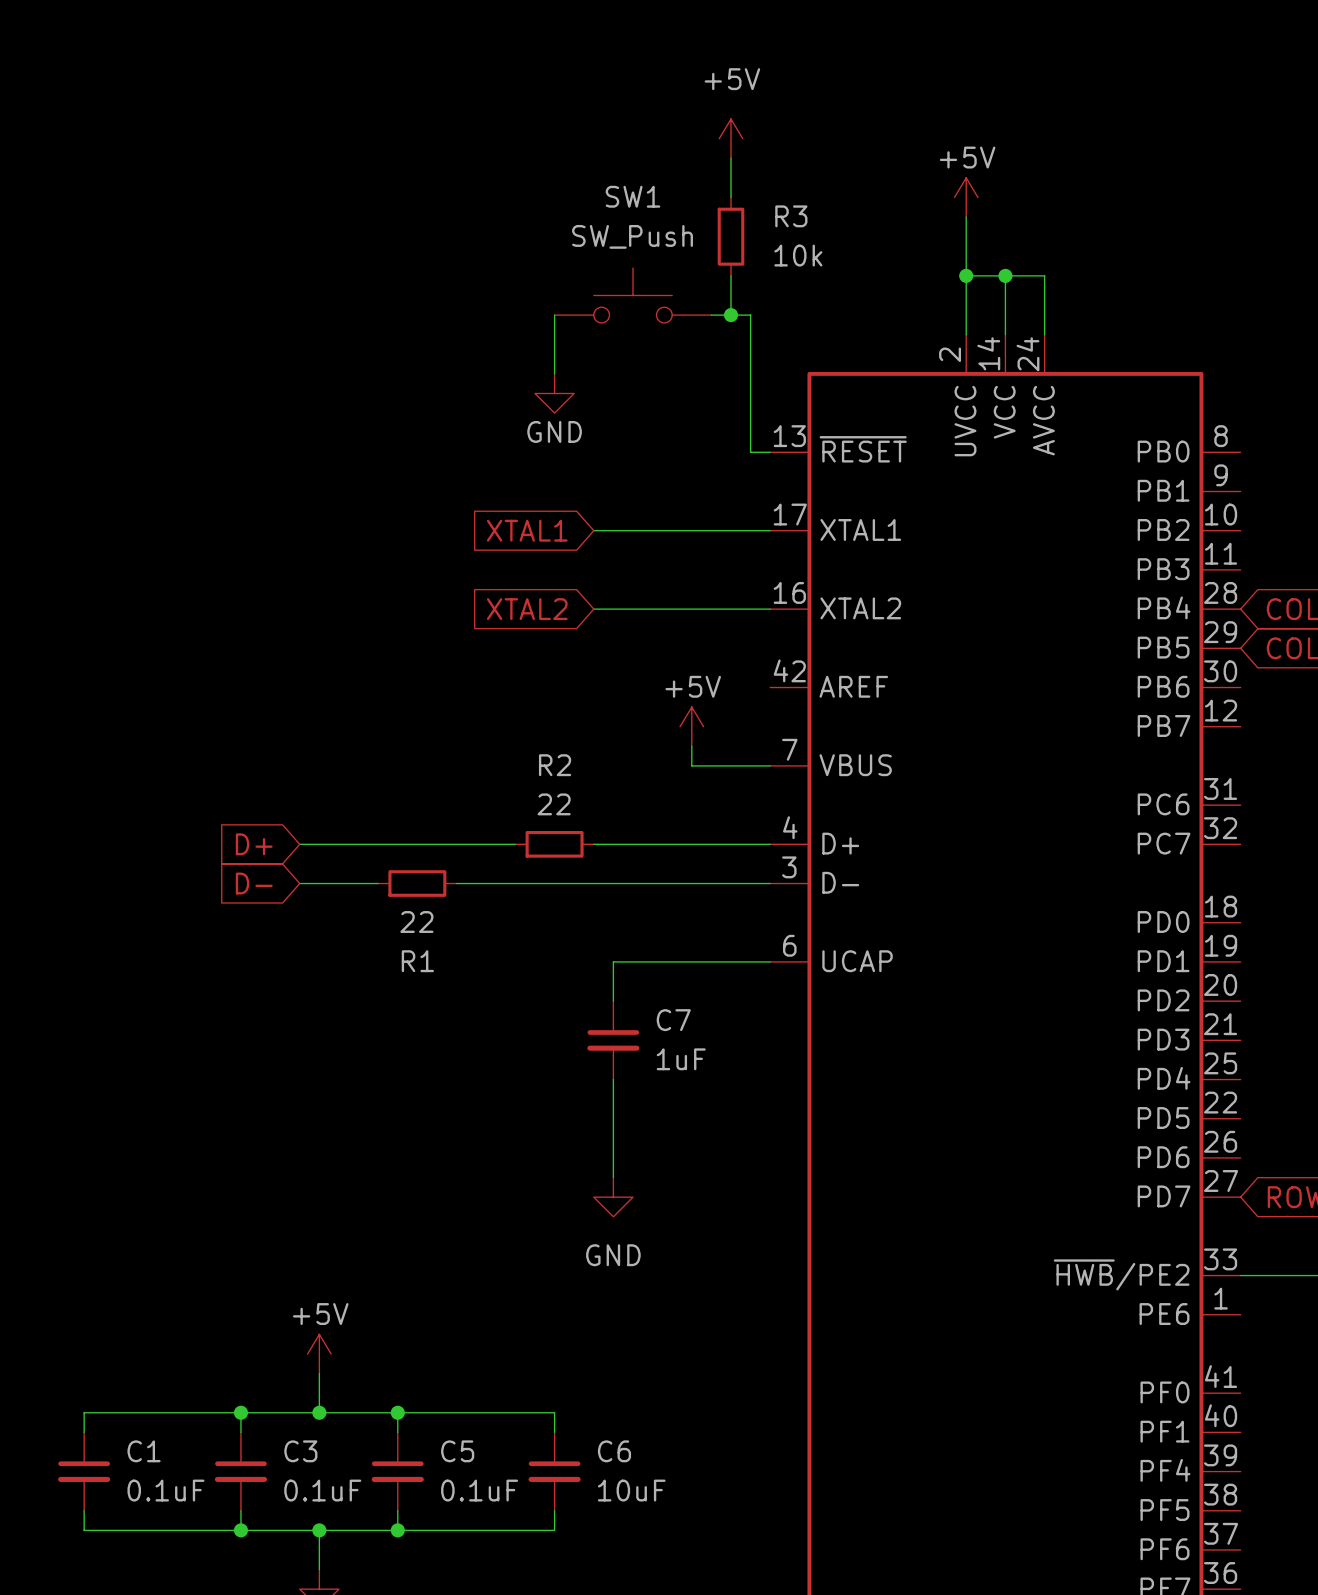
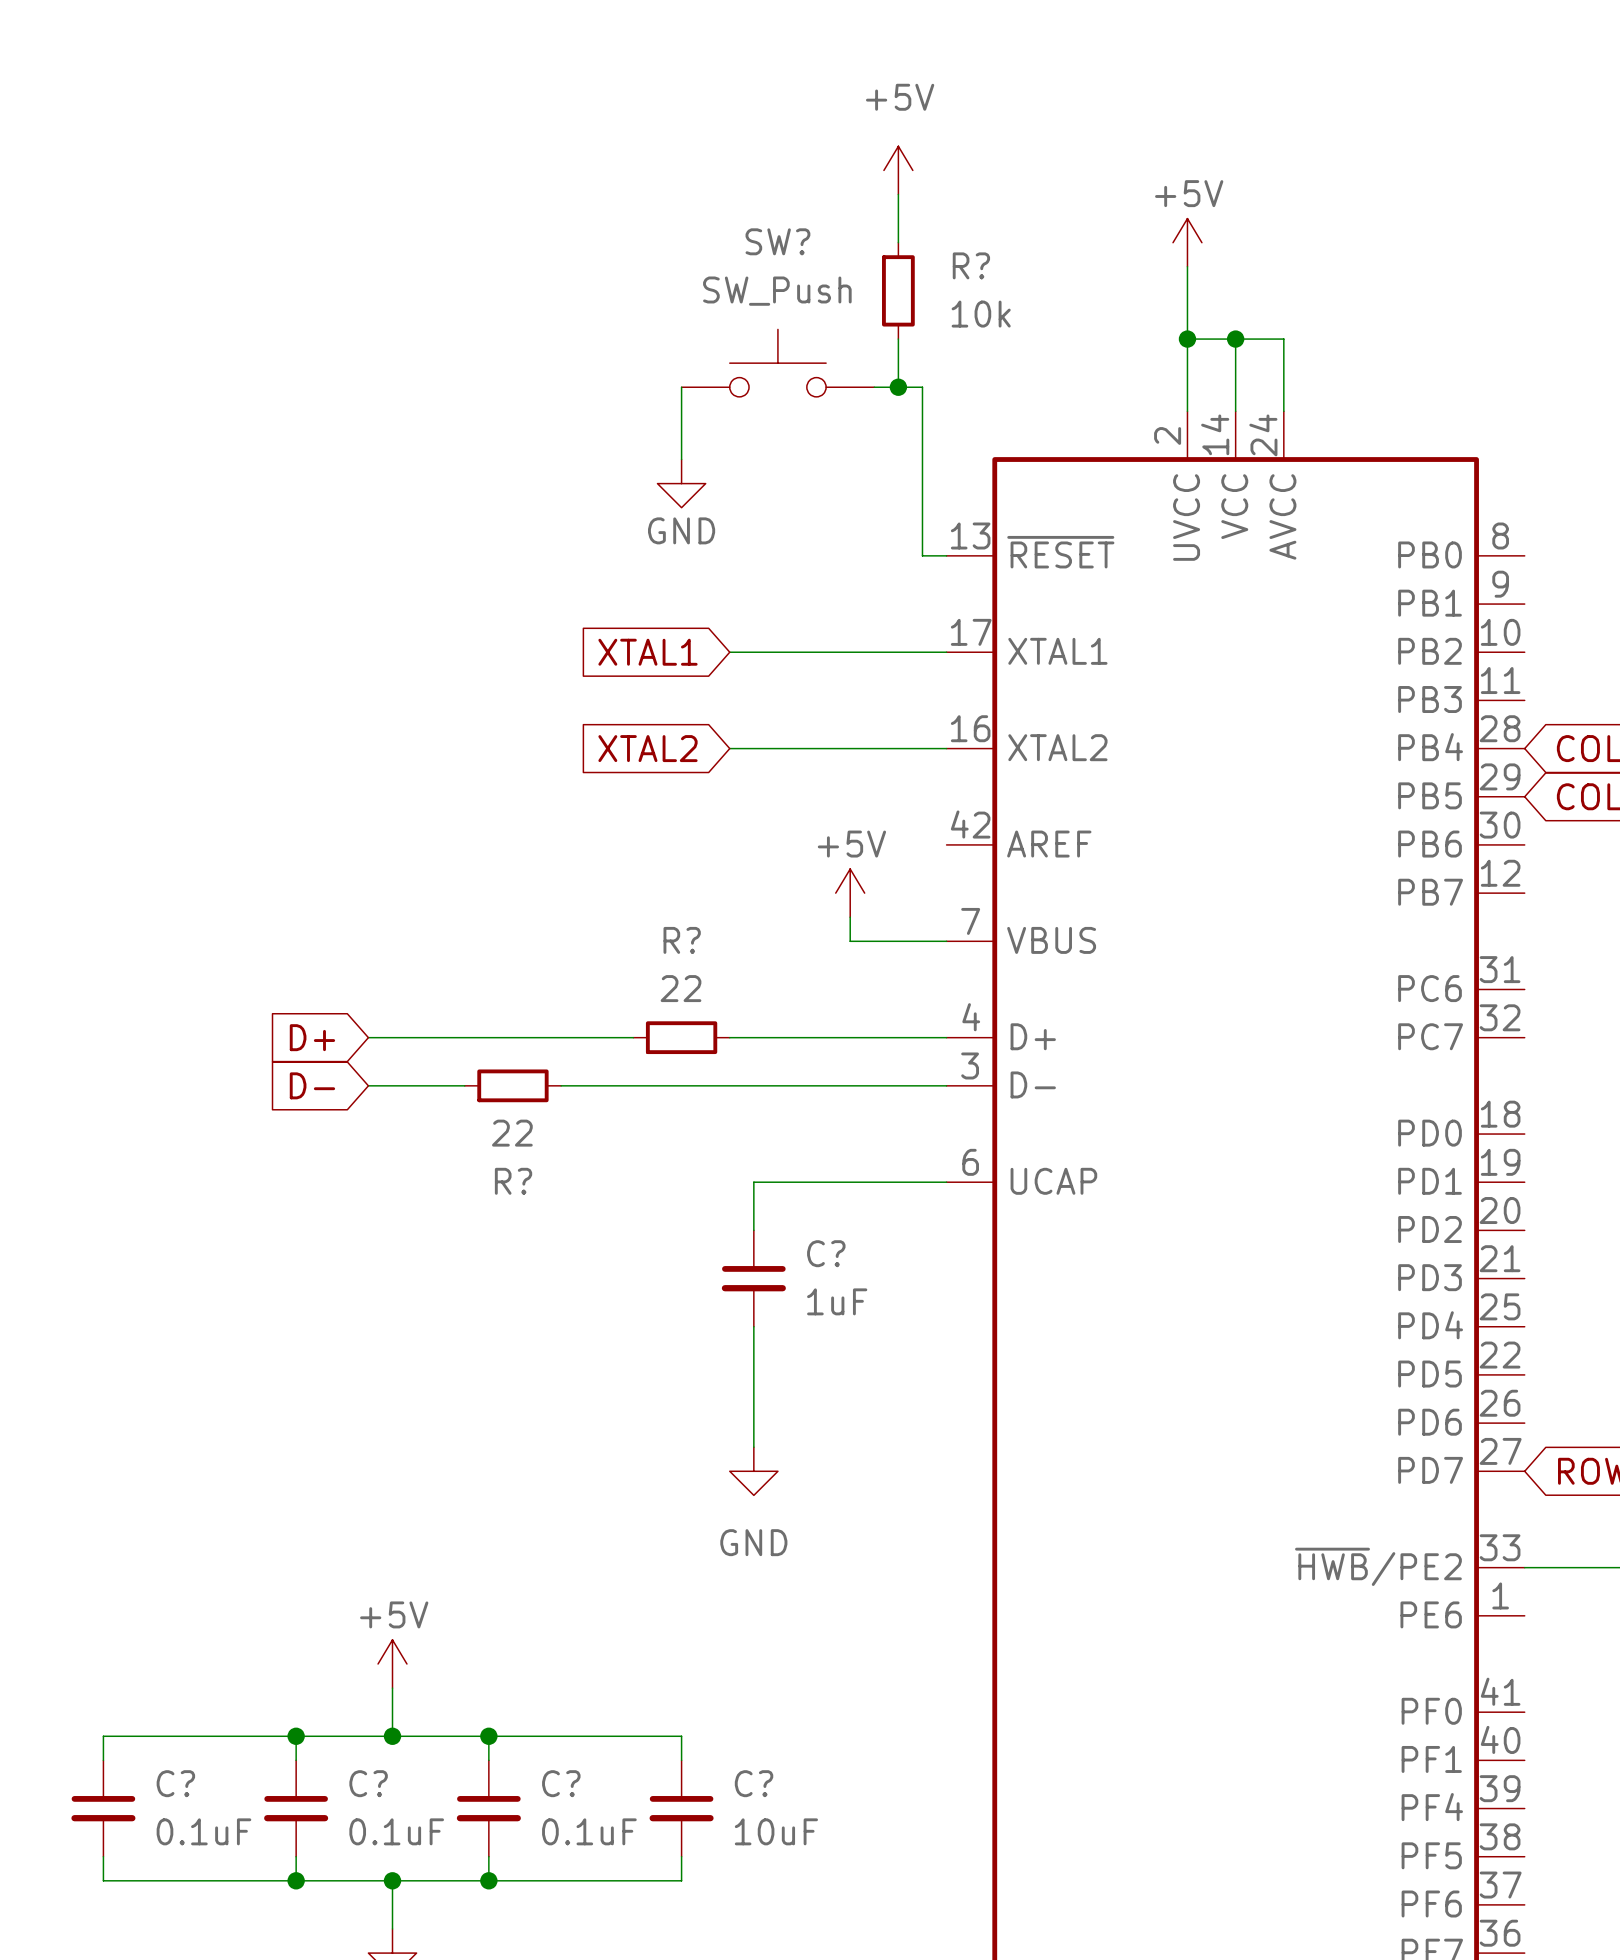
SW1 name: SW1 (632, 196) -> SW? (777, 241)
R3 name: R3 (791, 216) -> R? (971, 265)
R2 name: R2 (555, 765) -> R? (682, 940)
R1 name: R1 (417, 961) -> R? (513, 1181)
C7 name: C7 (673, 1020) -> C? (826, 1253)
C1 name: C1 (144, 1451) -> C? (175, 1783)
C3 name: C3 (300, 1451) -> C? (368, 1783)
C5 name: C5 (457, 1451) -> C? (561, 1783)
C6 name: C6 (614, 1451) -> C? (754, 1783)

